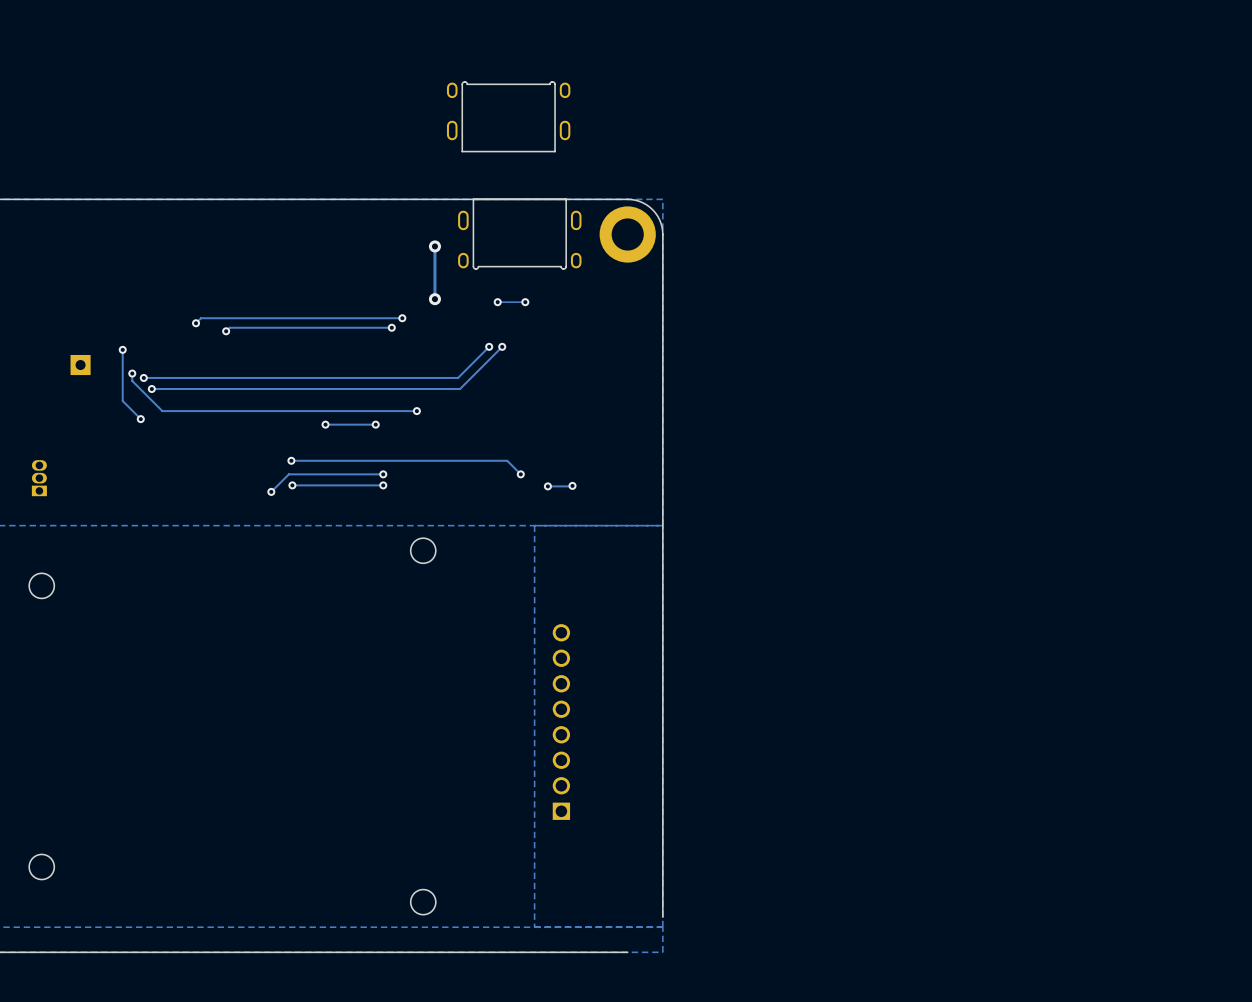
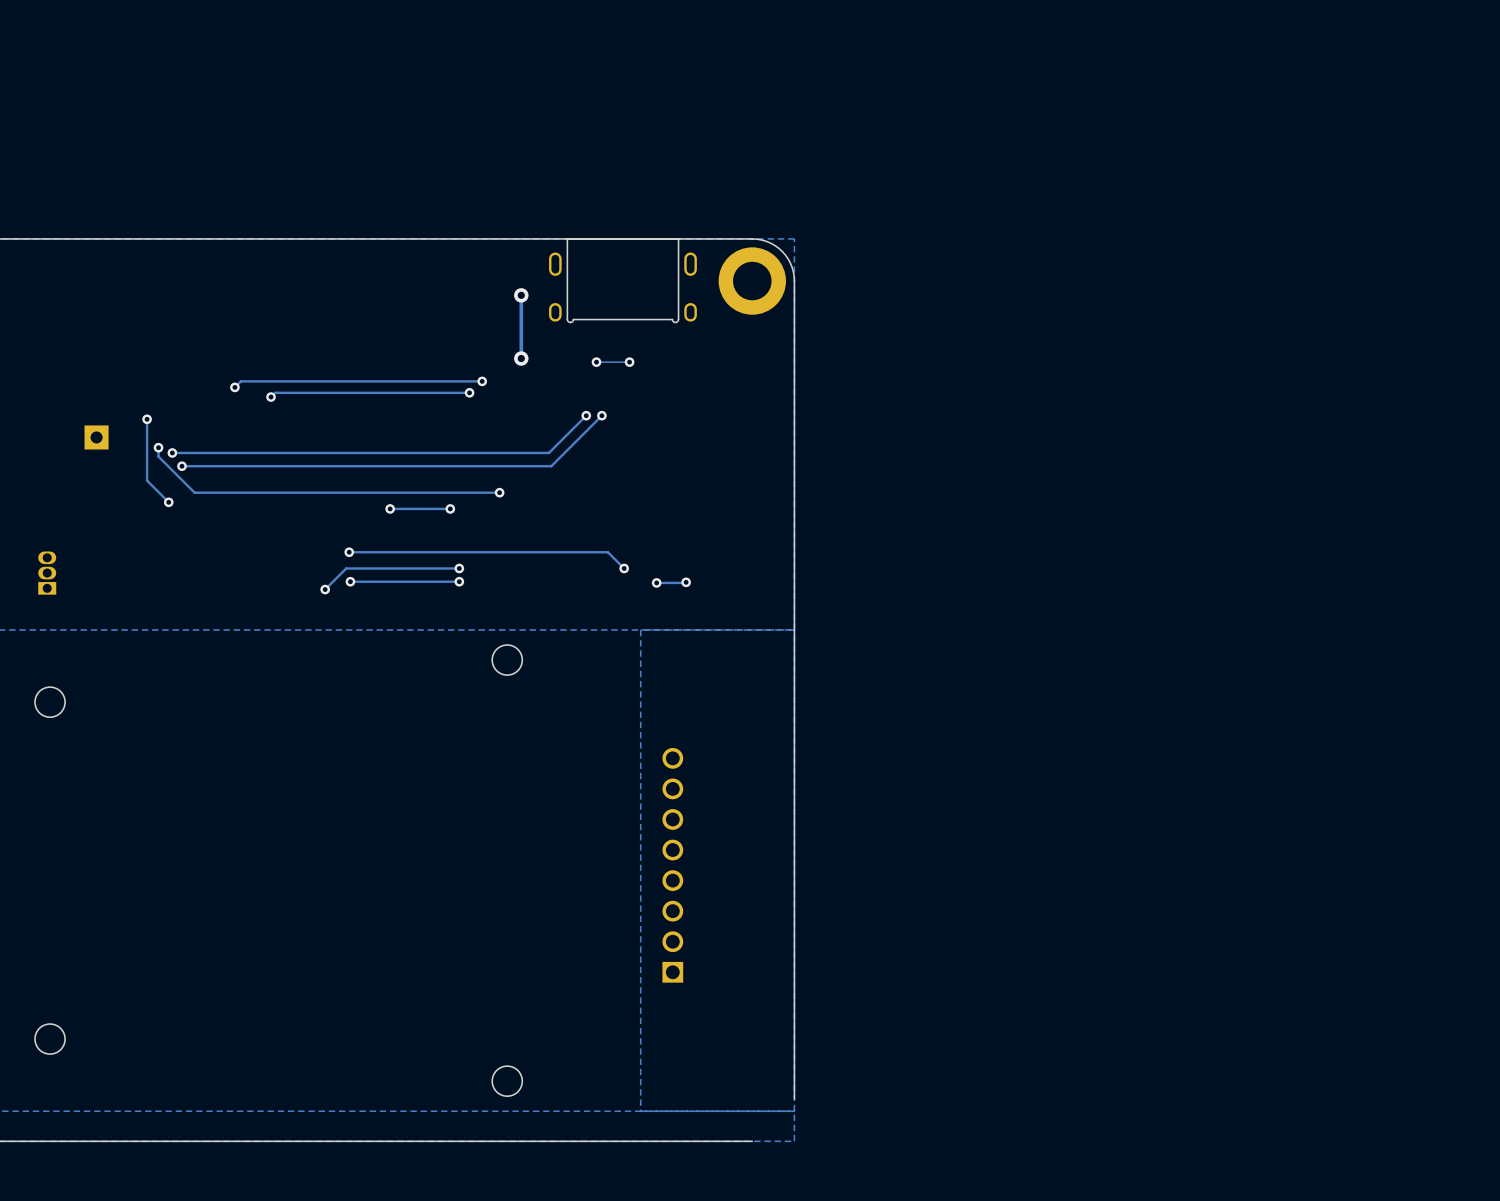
part: (508, 116) -> none

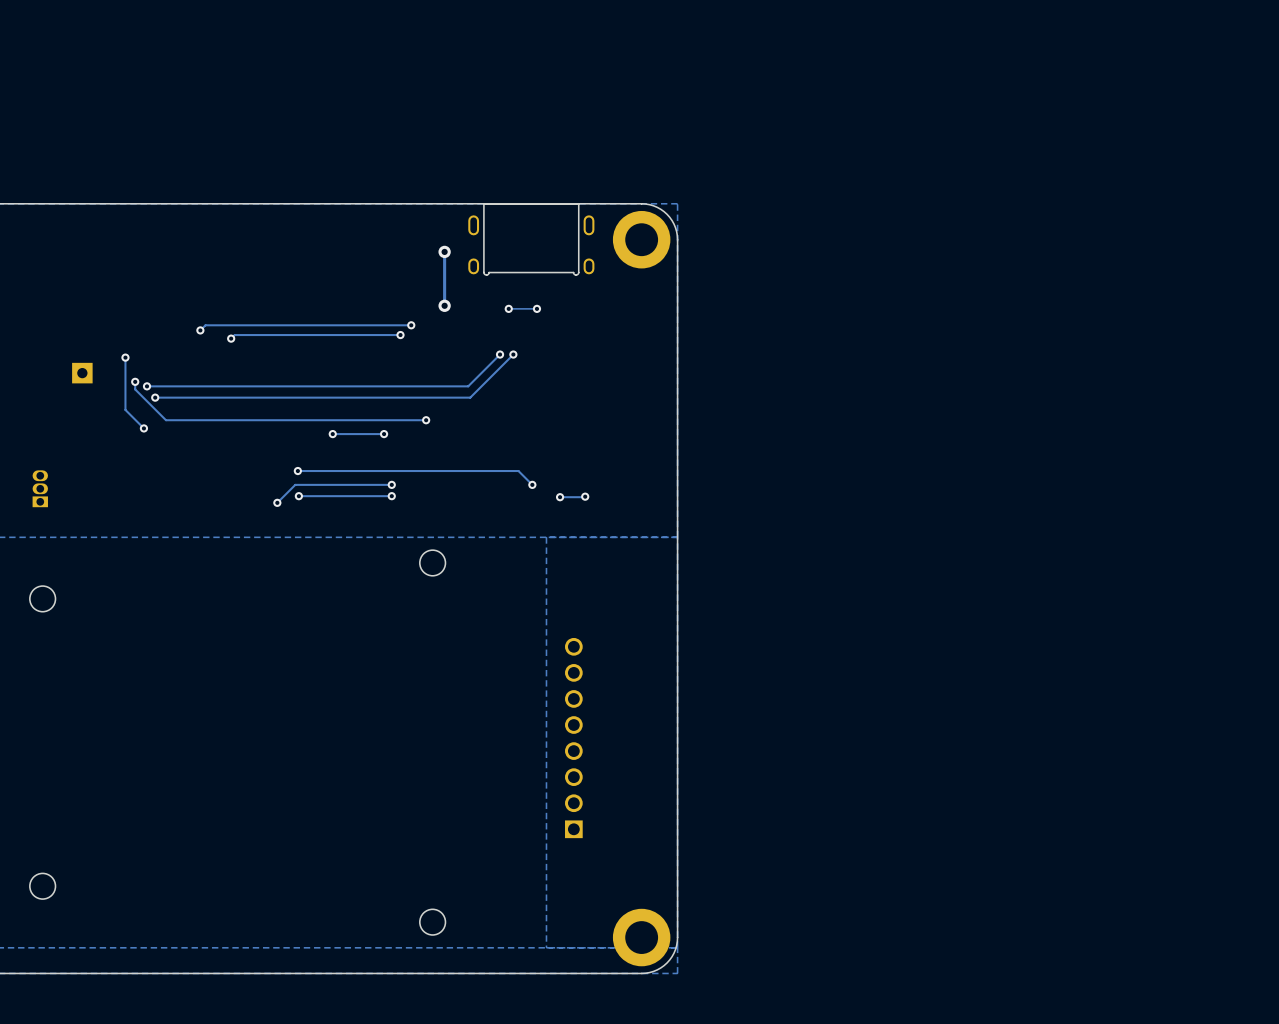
part: none -> (641, 937)
board edge: none -> (677, 937) (674, 953) (667, 962) (657, 969) (641, 973)

